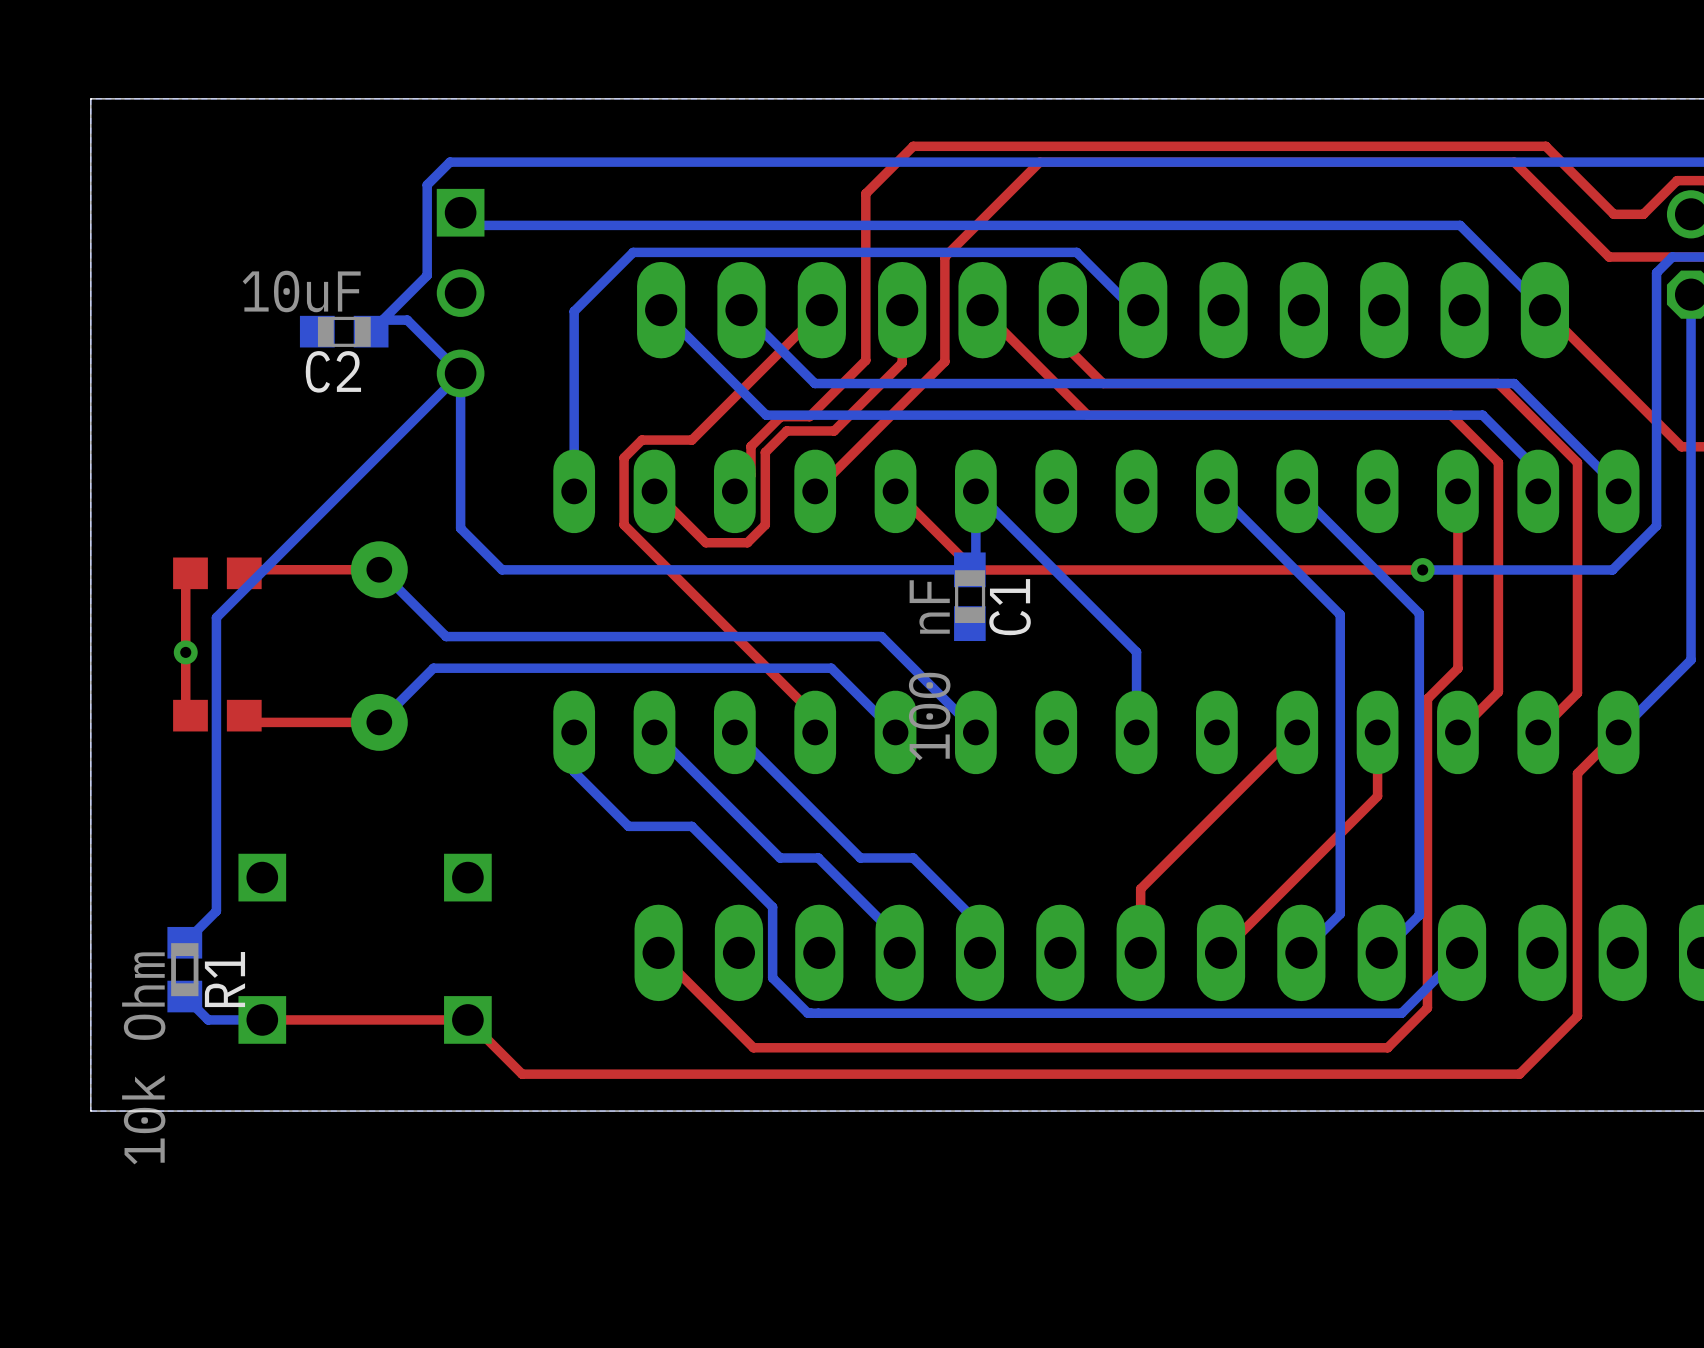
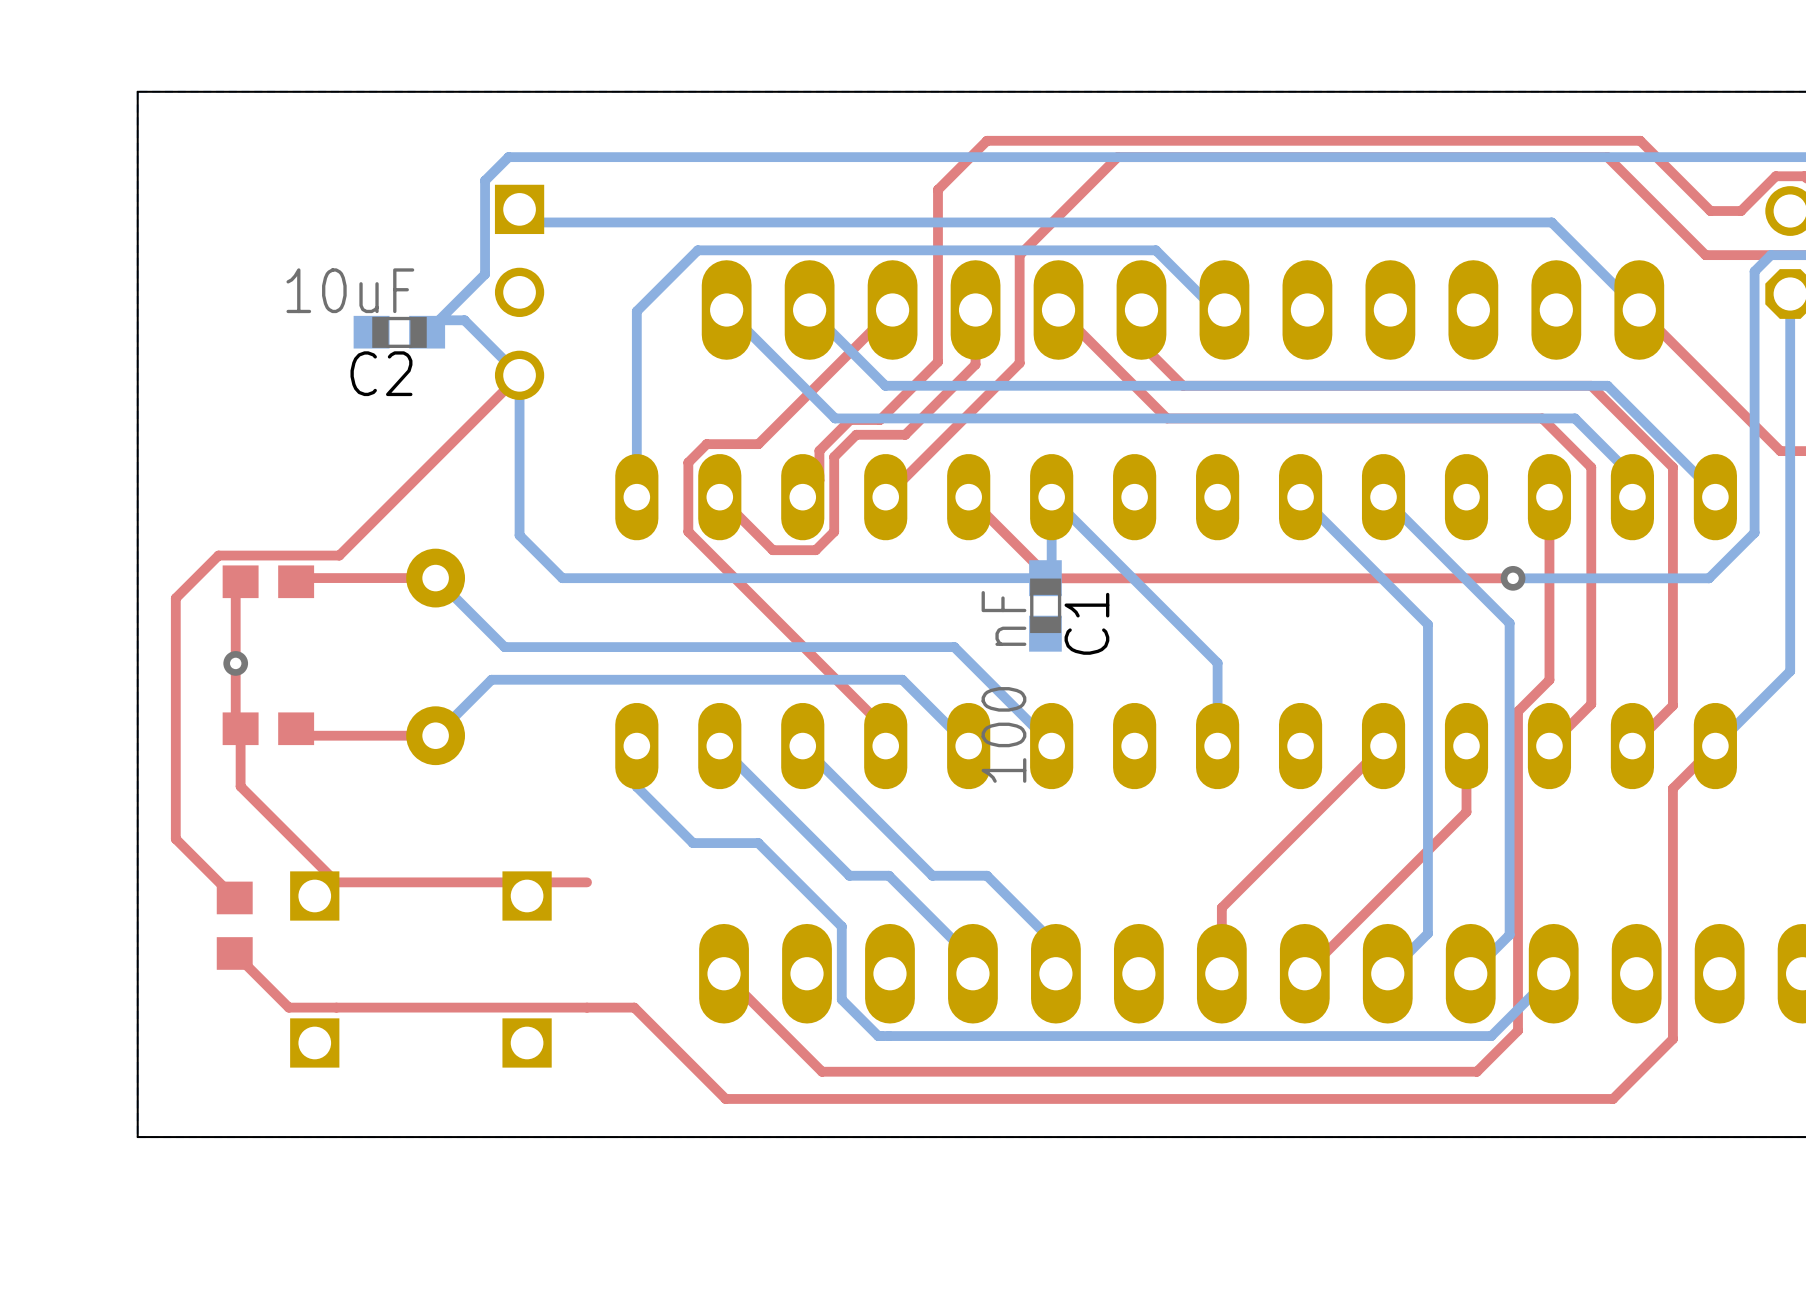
top track: none -> (519, 375) (339, 555) (218, 555) (175, 598) (175, 839) (234, 897)
bottom track: (460, 373) (216, 617) (216, 911) (184, 942) -> none
top track: none -> (240, 728) (240, 786) (336, 882) (587, 882)
R1 side: bottom (184, 969) -> top (234, 925)
bottom track: (184, 996) (208, 1019) (262, 1019) -> none
top track: (262, 1019) (467, 1019) (522, 1074) (660, 1074) -> (234, 953) (288, 1007) (634, 1007) (725, 1098)

